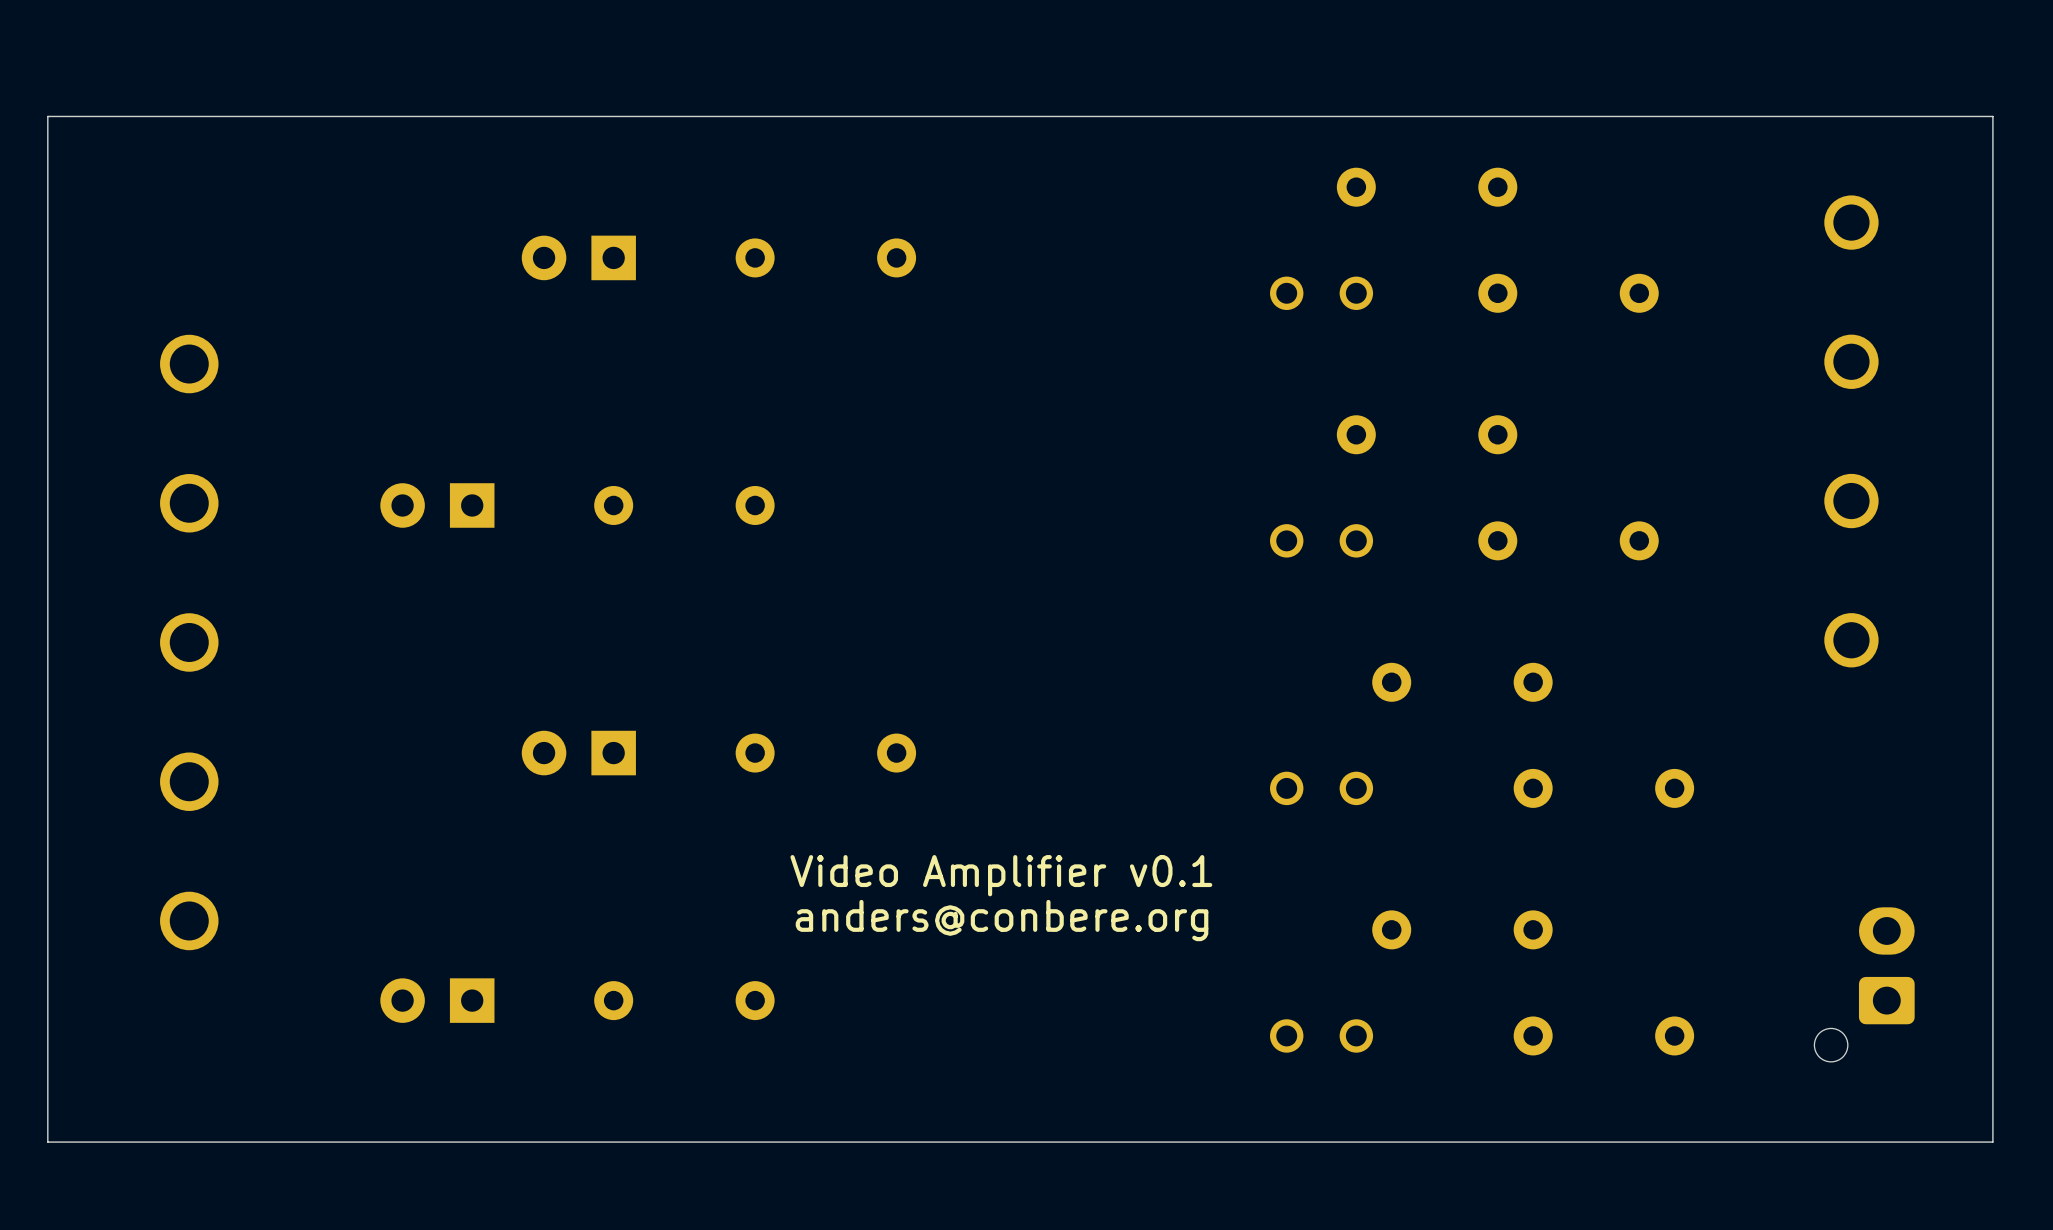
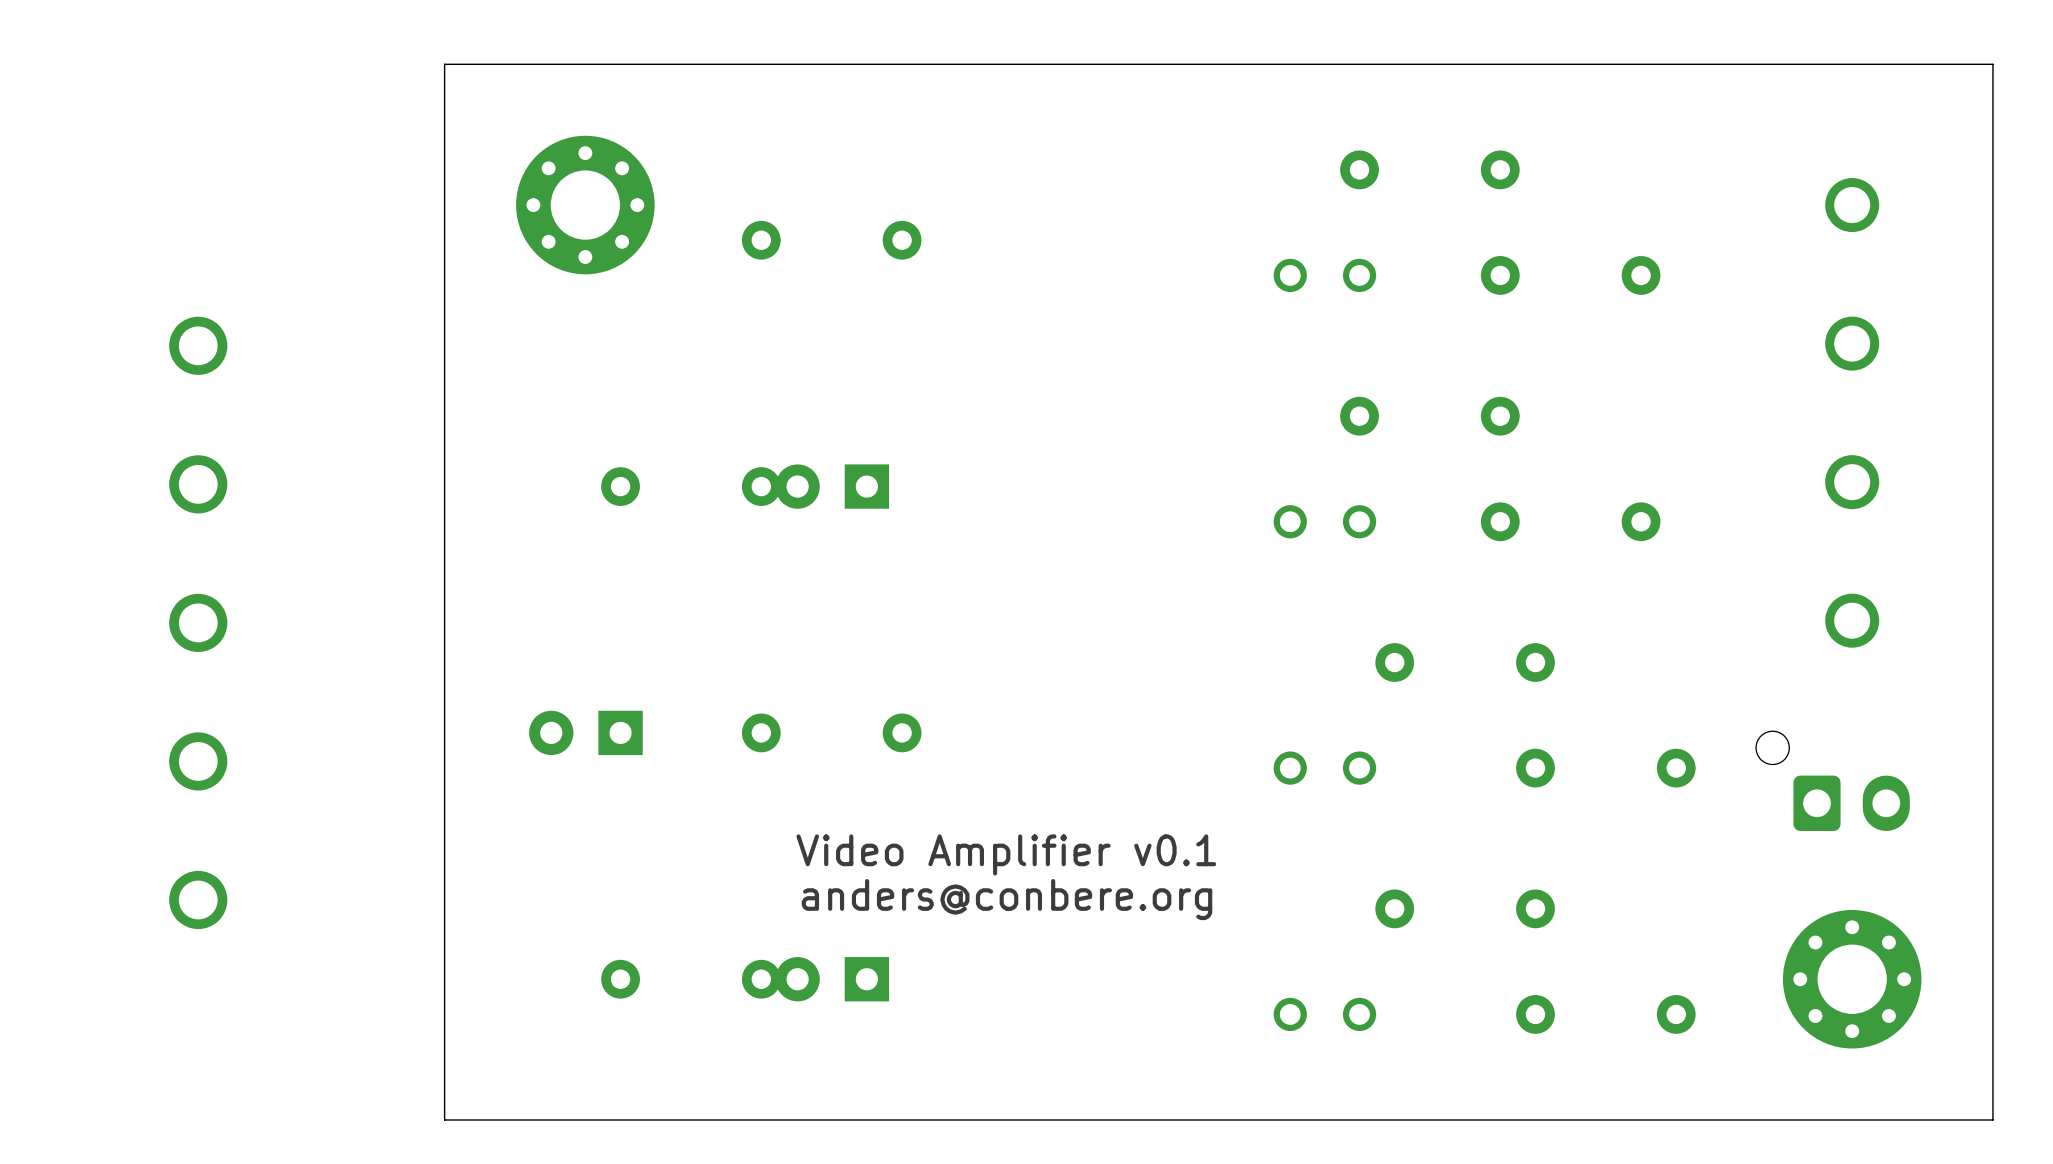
board edge: (1992, 116) (47, 116) (47, 1142) (436, 1142) -> (1992, 99) (1992, 64) (444, 64) (444, 1119)
part: none -> (585, 205)
part: (578, 257) -> none
part: (437, 505) -> none
part: none -> (832, 486)
part: none -> (1832, 781)
part footprint: [1814, 907, 1915, 1062] -> [1782, 909, 1922, 1049]
part: (437, 1000) -> none
part: none -> (832, 979)

